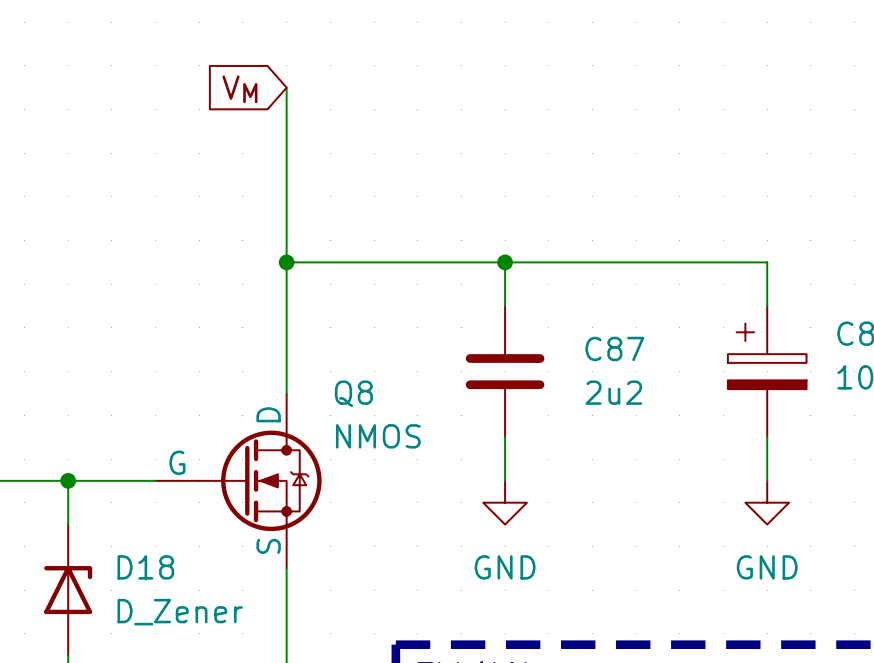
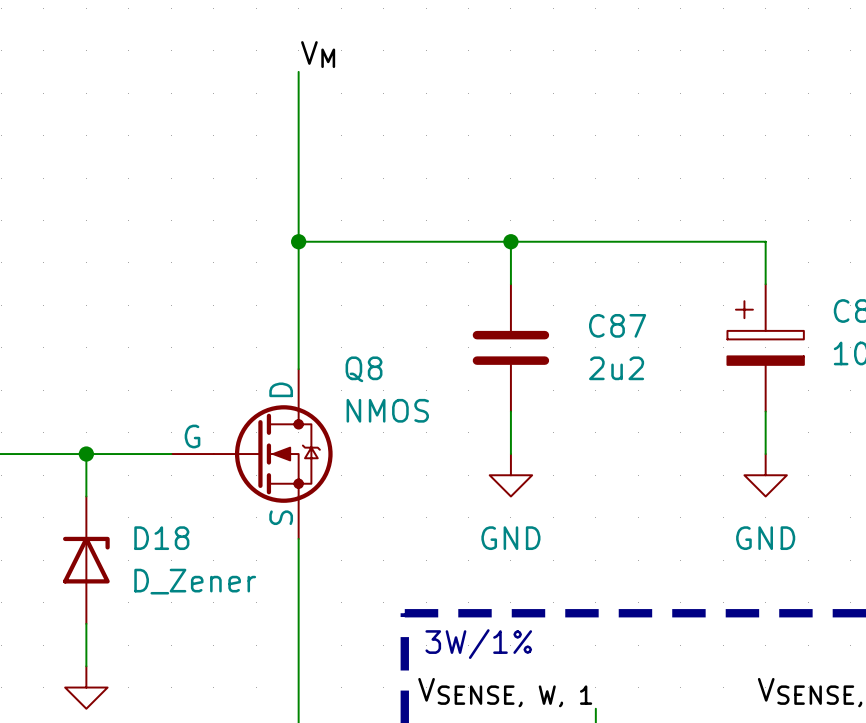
label: none -> VM (318, 54)
global label: VM (239, 89) -> none

